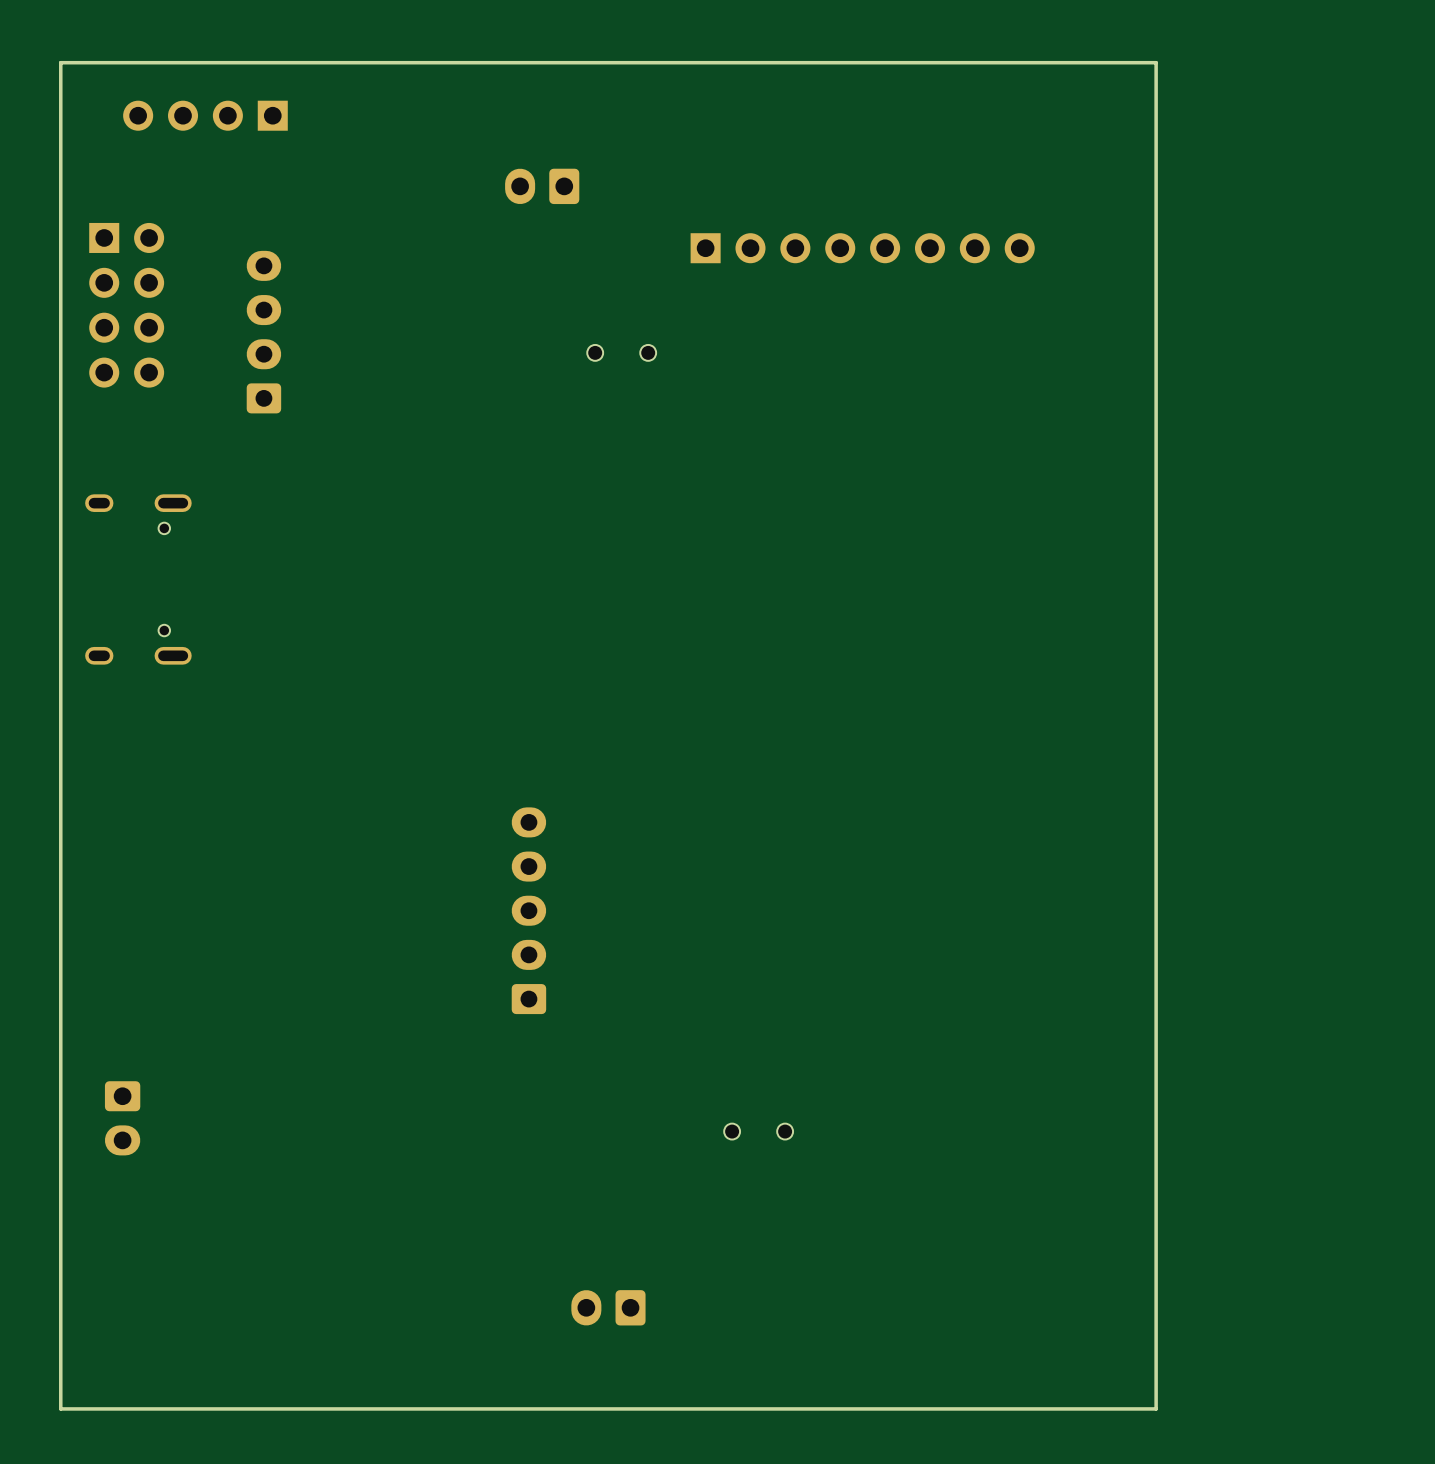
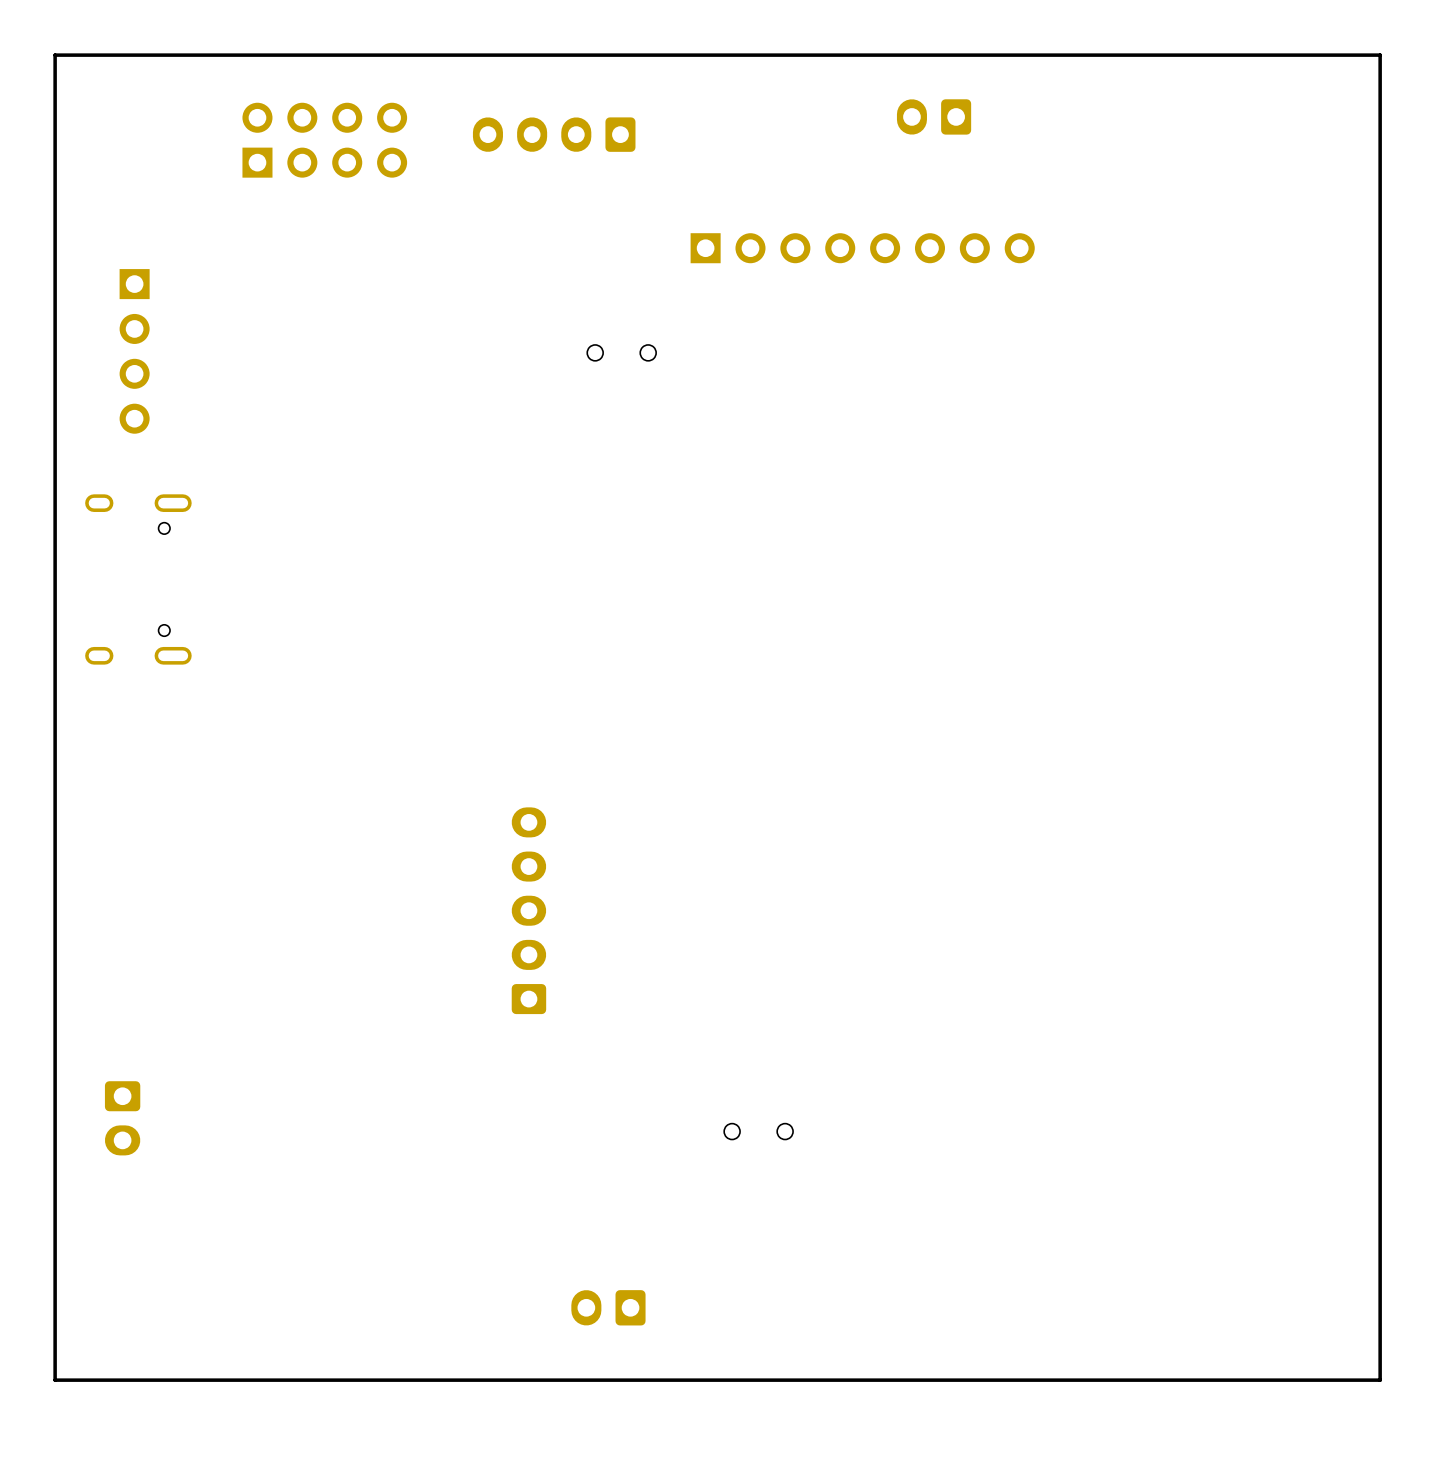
board edge: (1156, 62) (60, 62) (60, 1408) (1156, 1408) (1156, 62) -> (1380, 55) (1380, 1380) (55, 1380) (55, 55) (1380, 55)
part rotation: 0° (205, 115) -> 90° counterclockwise (134, 351)
part position: (205, 115) -> (134, 351)
part position: (542, 186) -> (934, 116)
part rotation: 0° (126, 305) -> 90° counterclockwise (324, 140)
part position: (126, 305) -> (324, 140)
part rotation: 0° (263, 332) -> 90° counterclockwise (554, 134)
part position: (263, 332) -> (554, 134)

